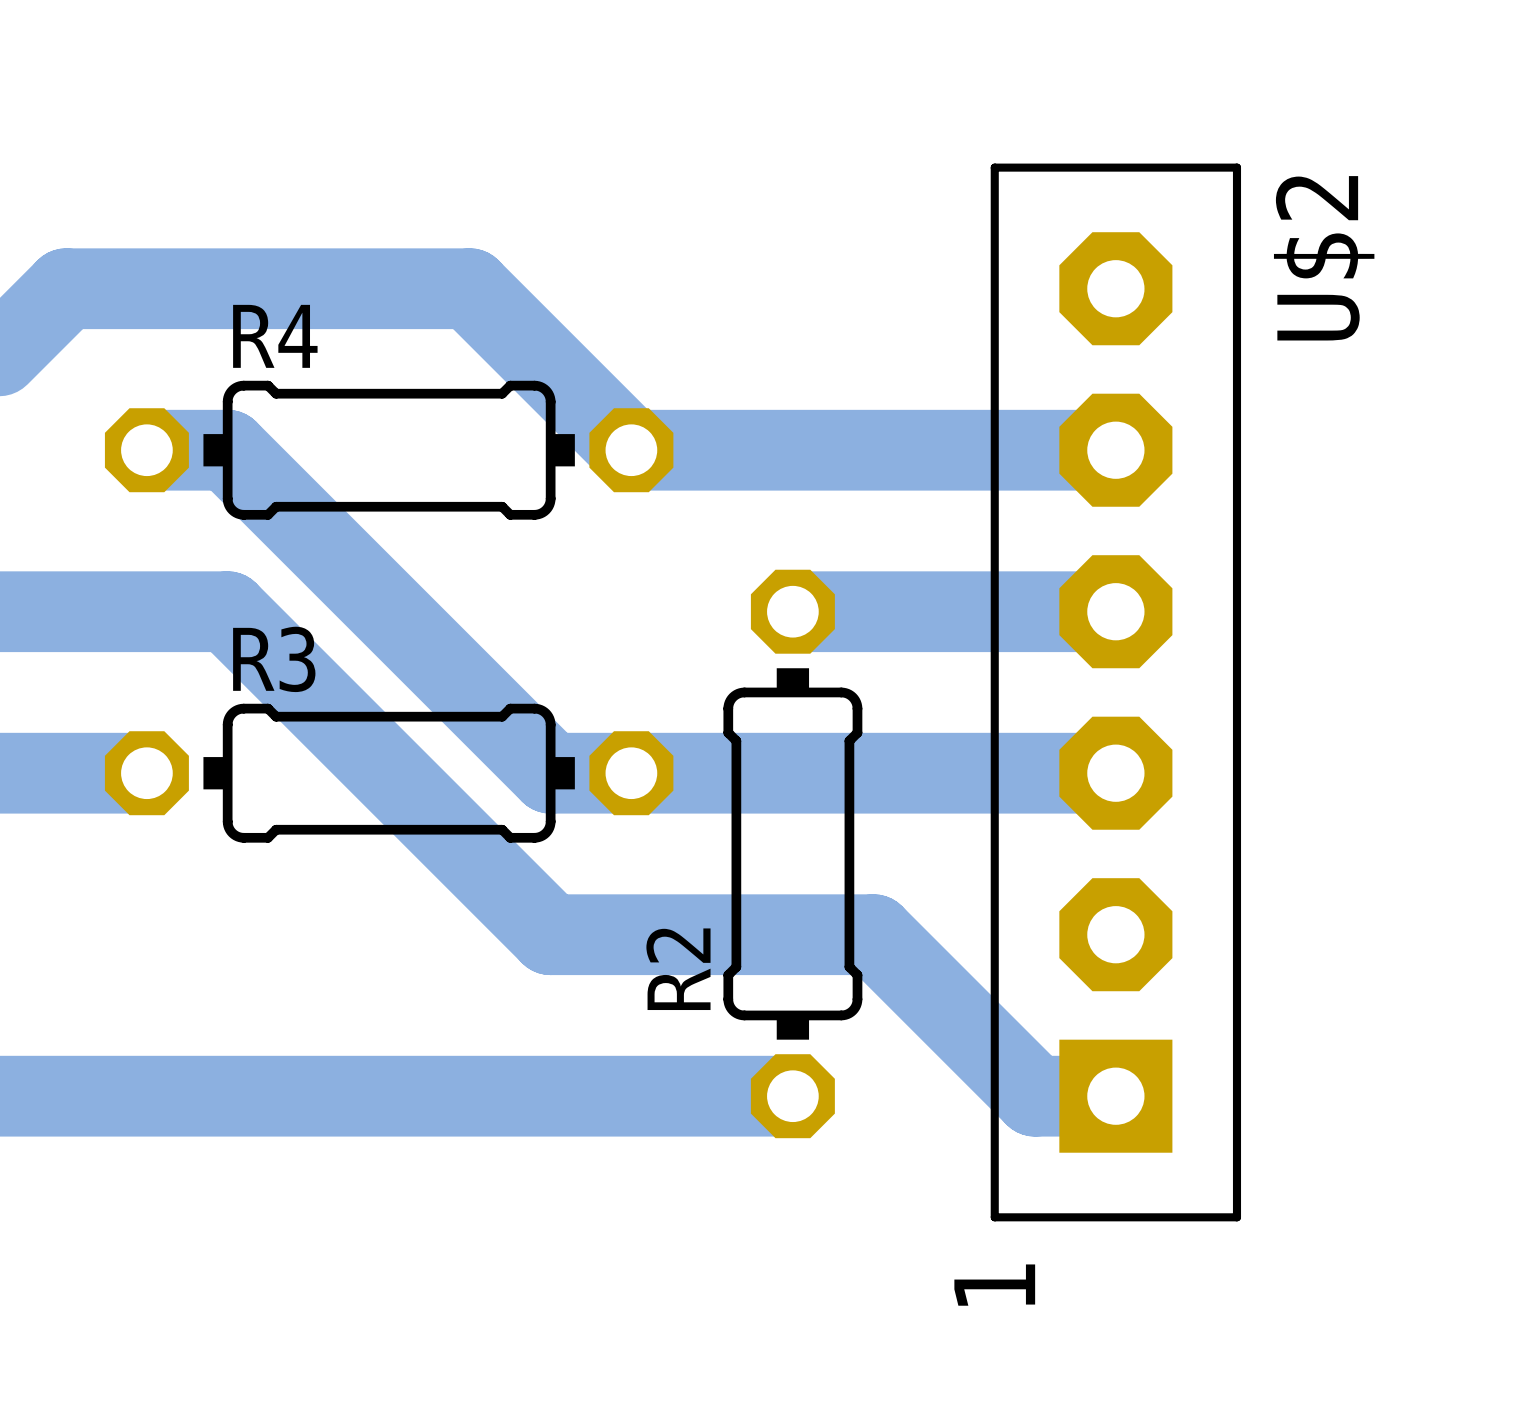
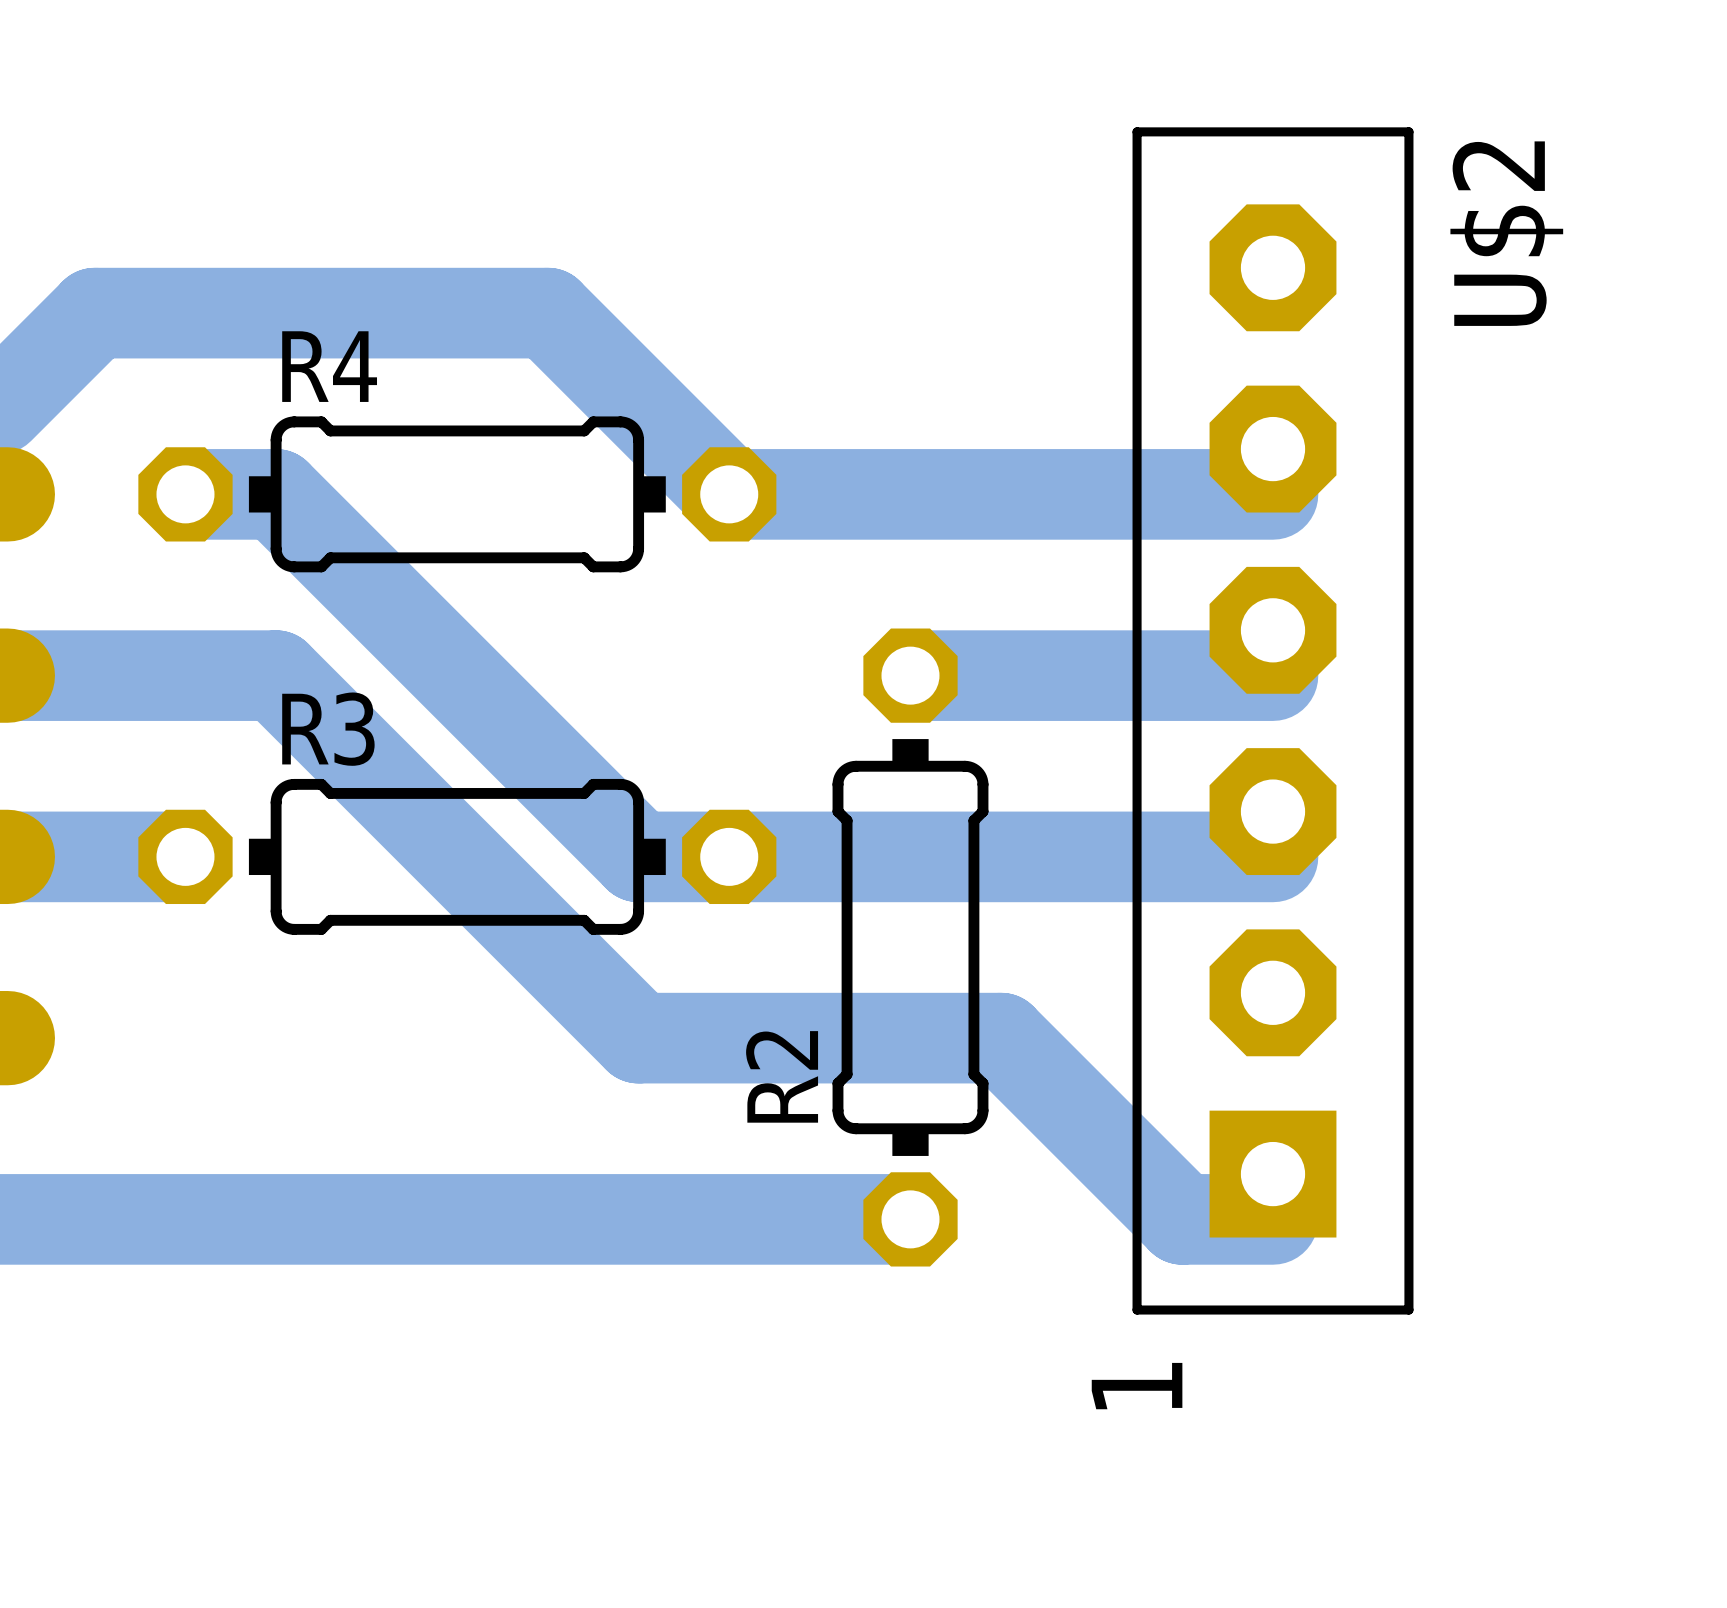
U$2 position: (1115, 692) -> (1273, 720)

